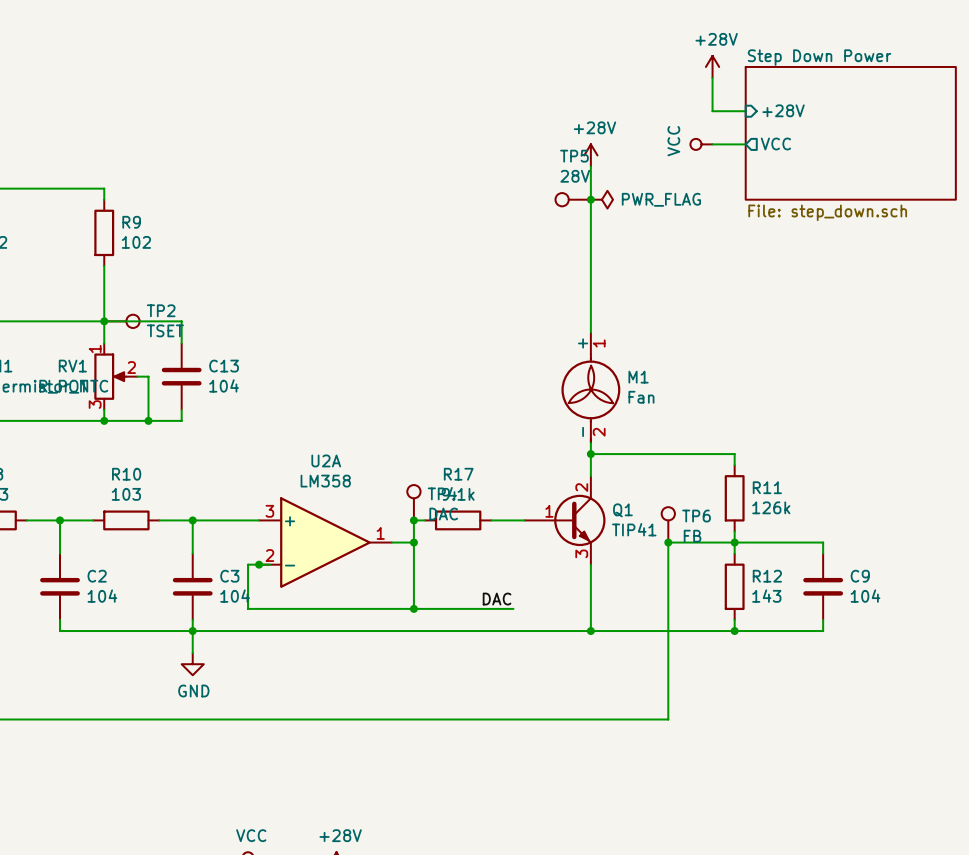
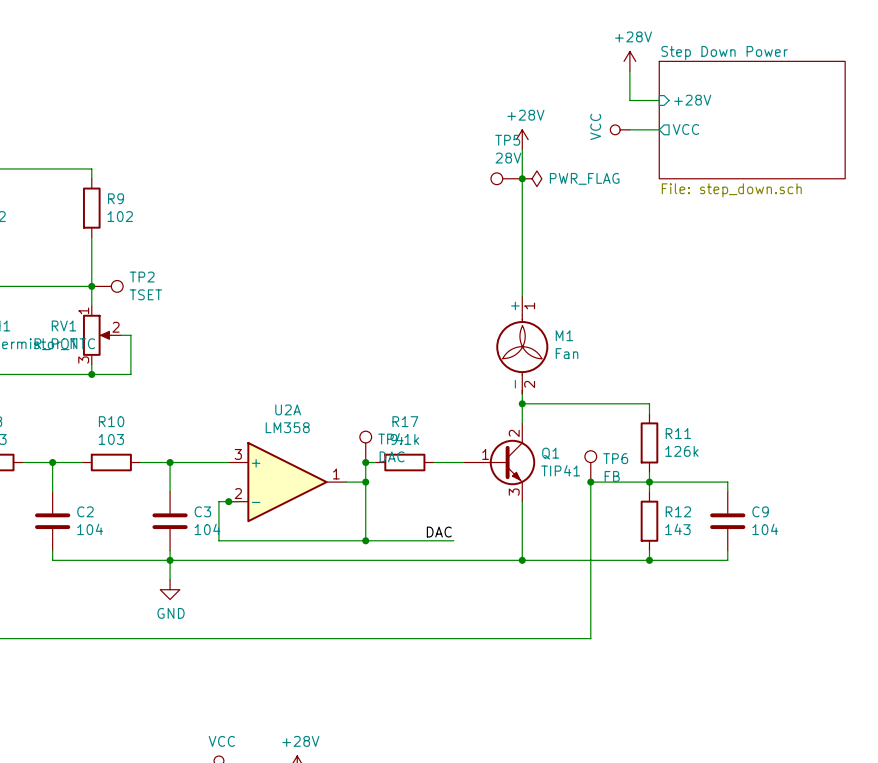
wire: (104, 321) (181, 321) (181, 343) -> none
C13: 104 (181, 376) -> none
wire: (181, 409) (181, 420) (148, 420) -> none
junction: (148, 420) -> none

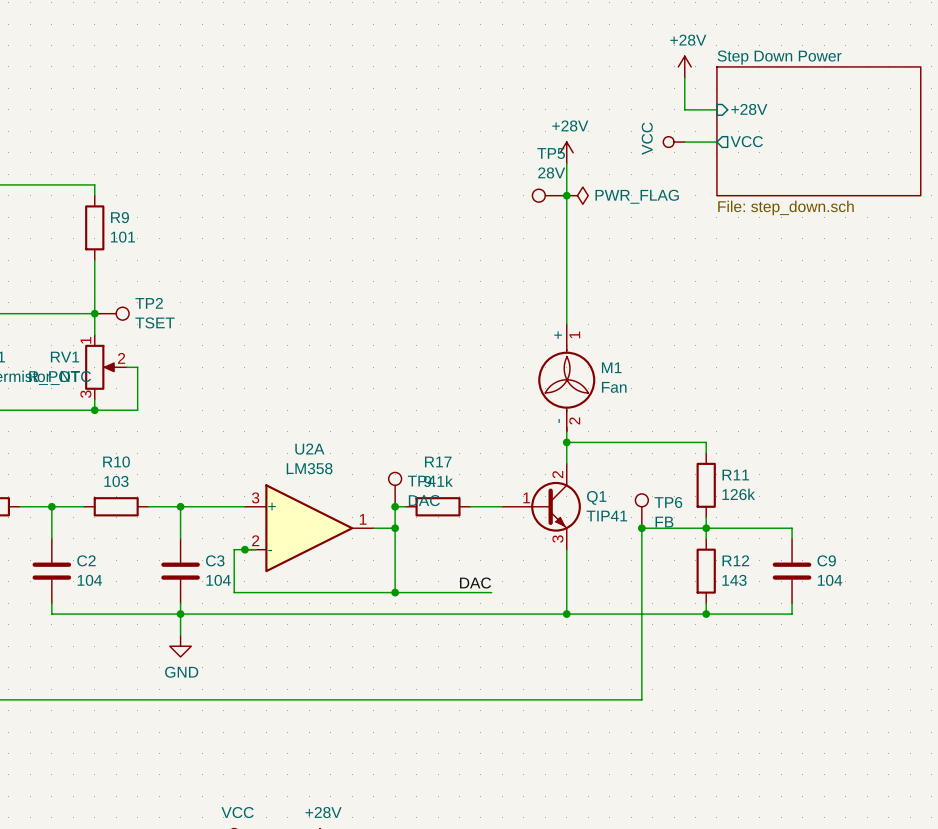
R9 value: 102 (120, 216) -> 101 (122, 237)

